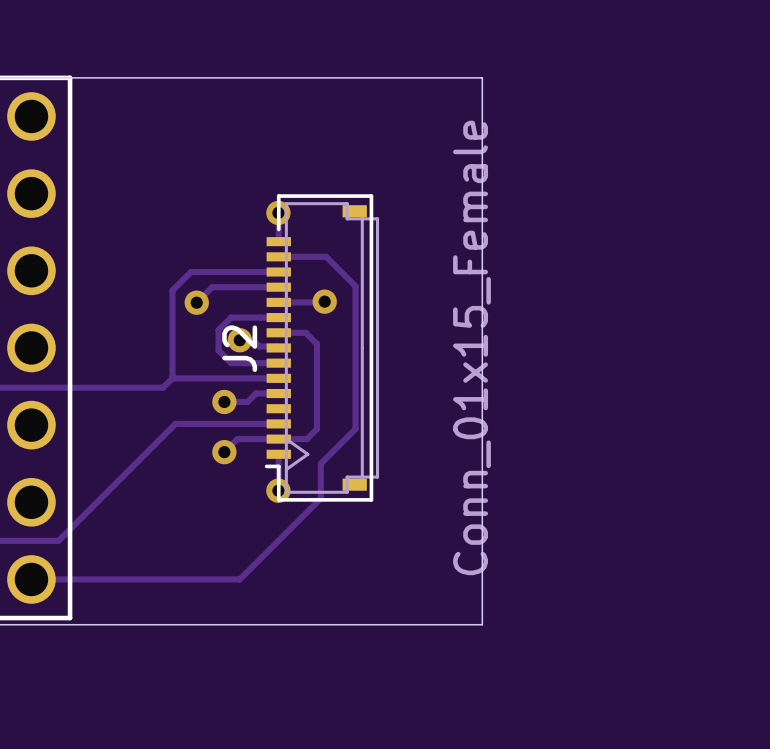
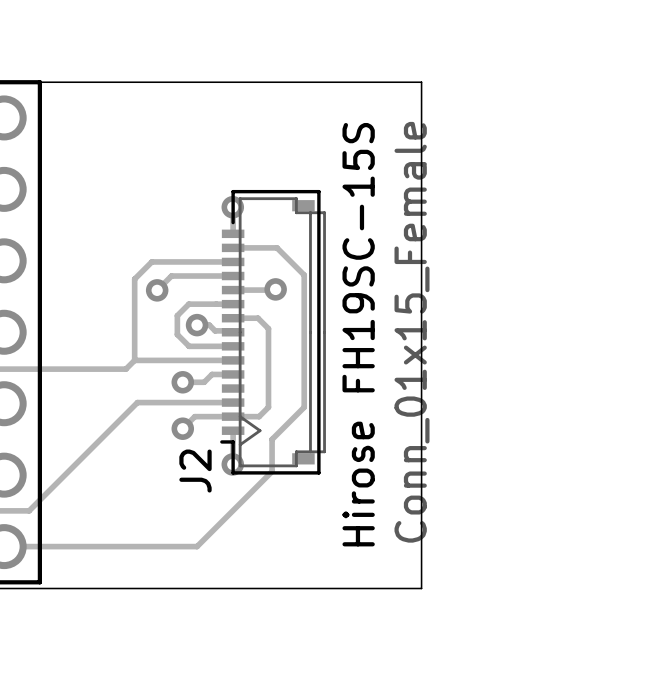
J2 name position: J2 (239, 348) -> J2 (195, 471)
text: none -> Hirose FH19SC-15S (358, 334)

